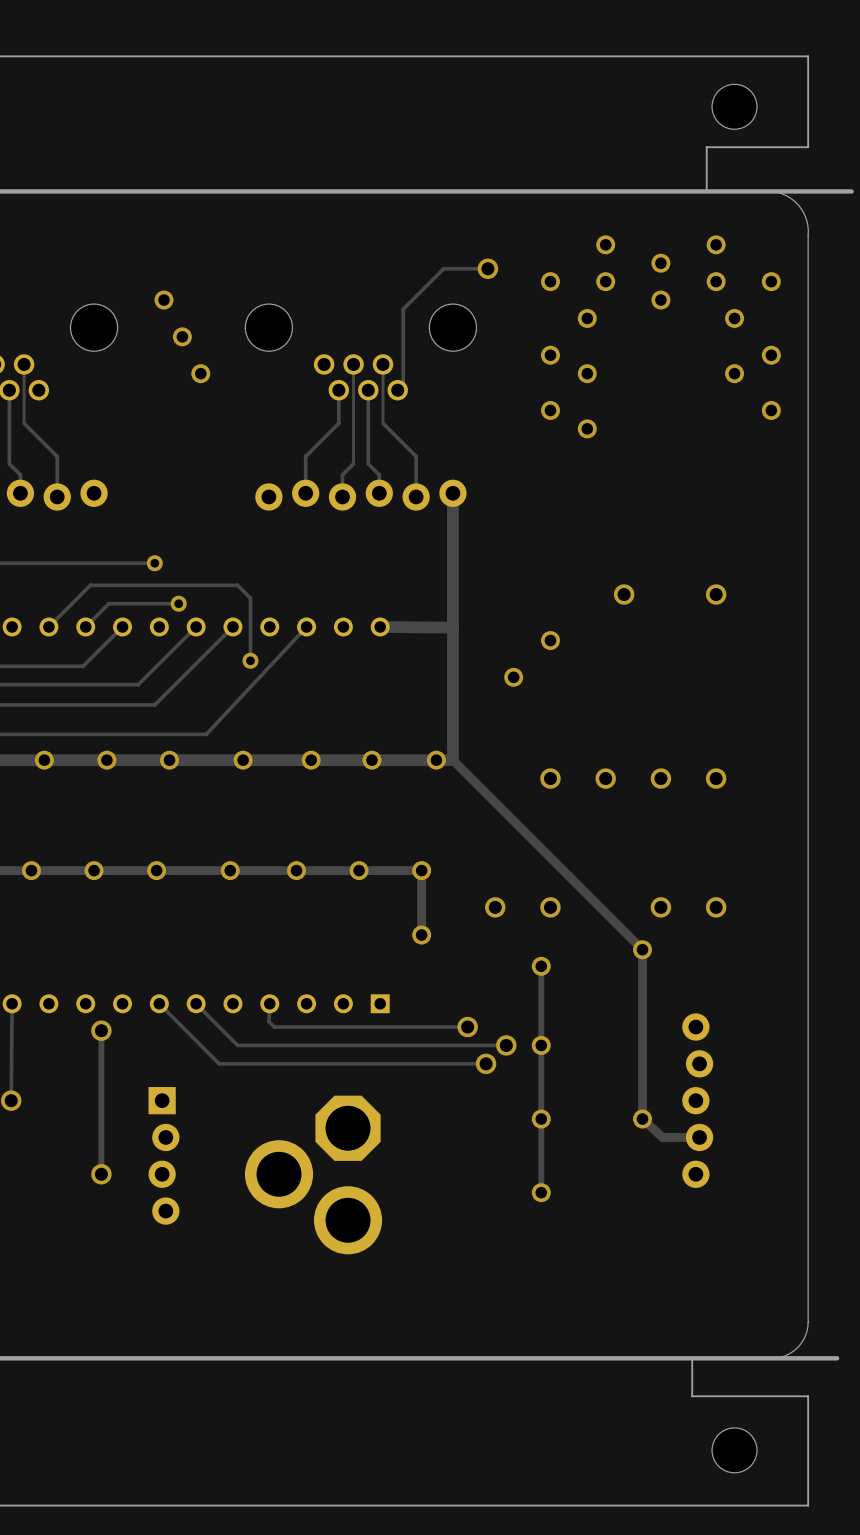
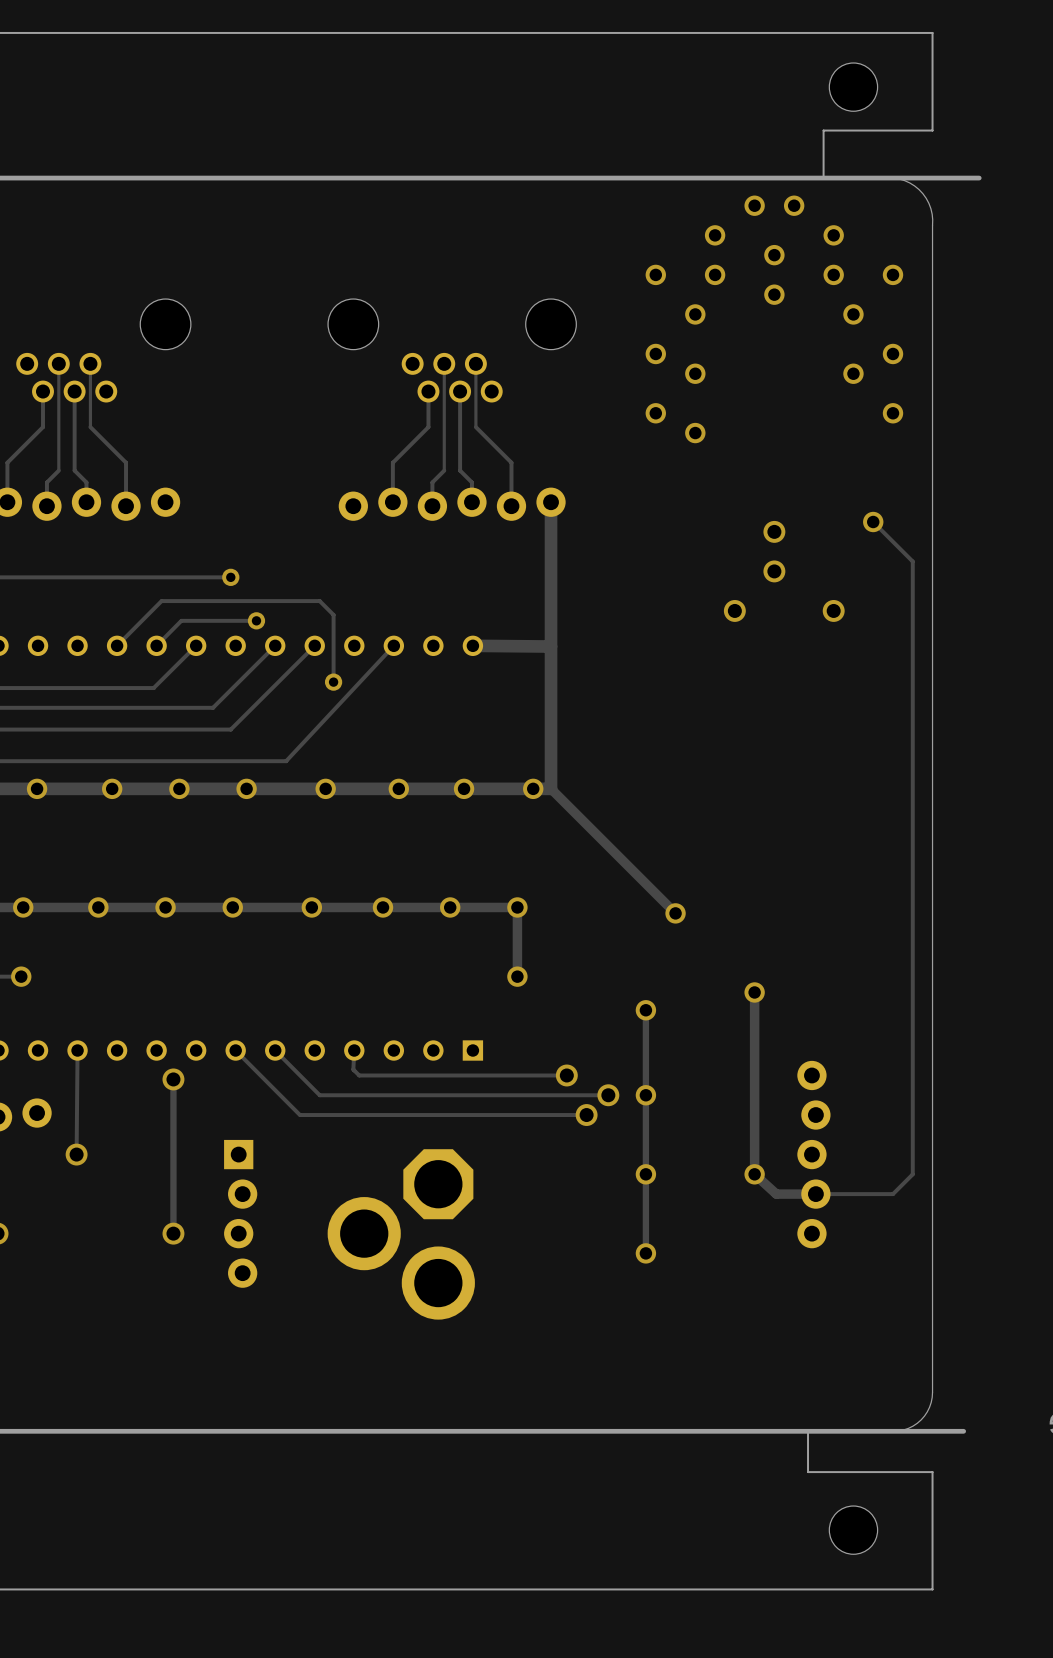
via: none -> (754, 205)
via: none -> (794, 205)
track: (487, 268) (443, 268) (403, 309) (403, 384) (397, 390) -> none
via: (487, 268) -> none
via: (163, 300) -> none
via: (182, 336) -> none
via: (200, 373) -> none
track: none -> (873, 522) (912, 561) (912, 1174) (893, 1194) (815, 1194)
via: none -> (873, 522)
via: none -> (774, 531)
via: none -> (774, 571)
via: (550, 640) -> none
via: (513, 677) -> none
via: (550, 778) -> none
via: (605, 778) -> none
via: (660, 778) -> none
via: (716, 778) -> none
track: (568, 876) (642, 949) -> none
via: none -> (675, 913)
via: (495, 907) -> none
via: (550, 907) -> none
via: (660, 907) -> none
via: (716, 907) -> none

